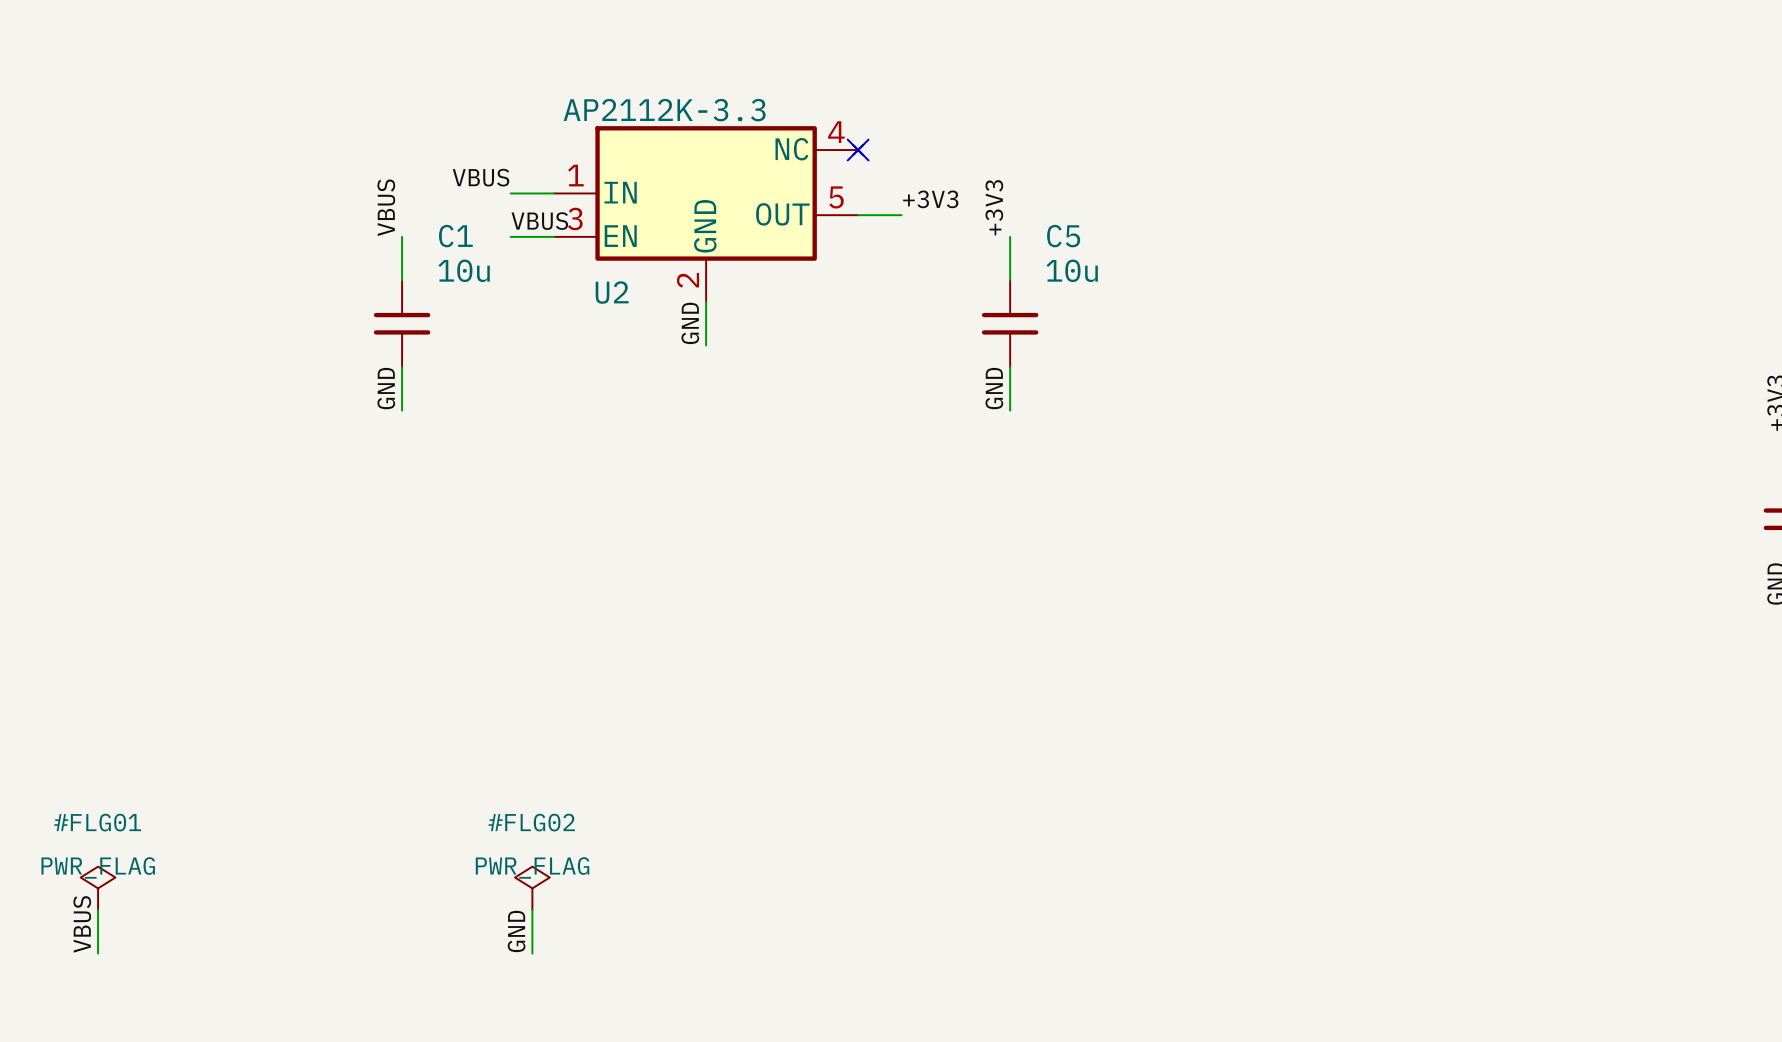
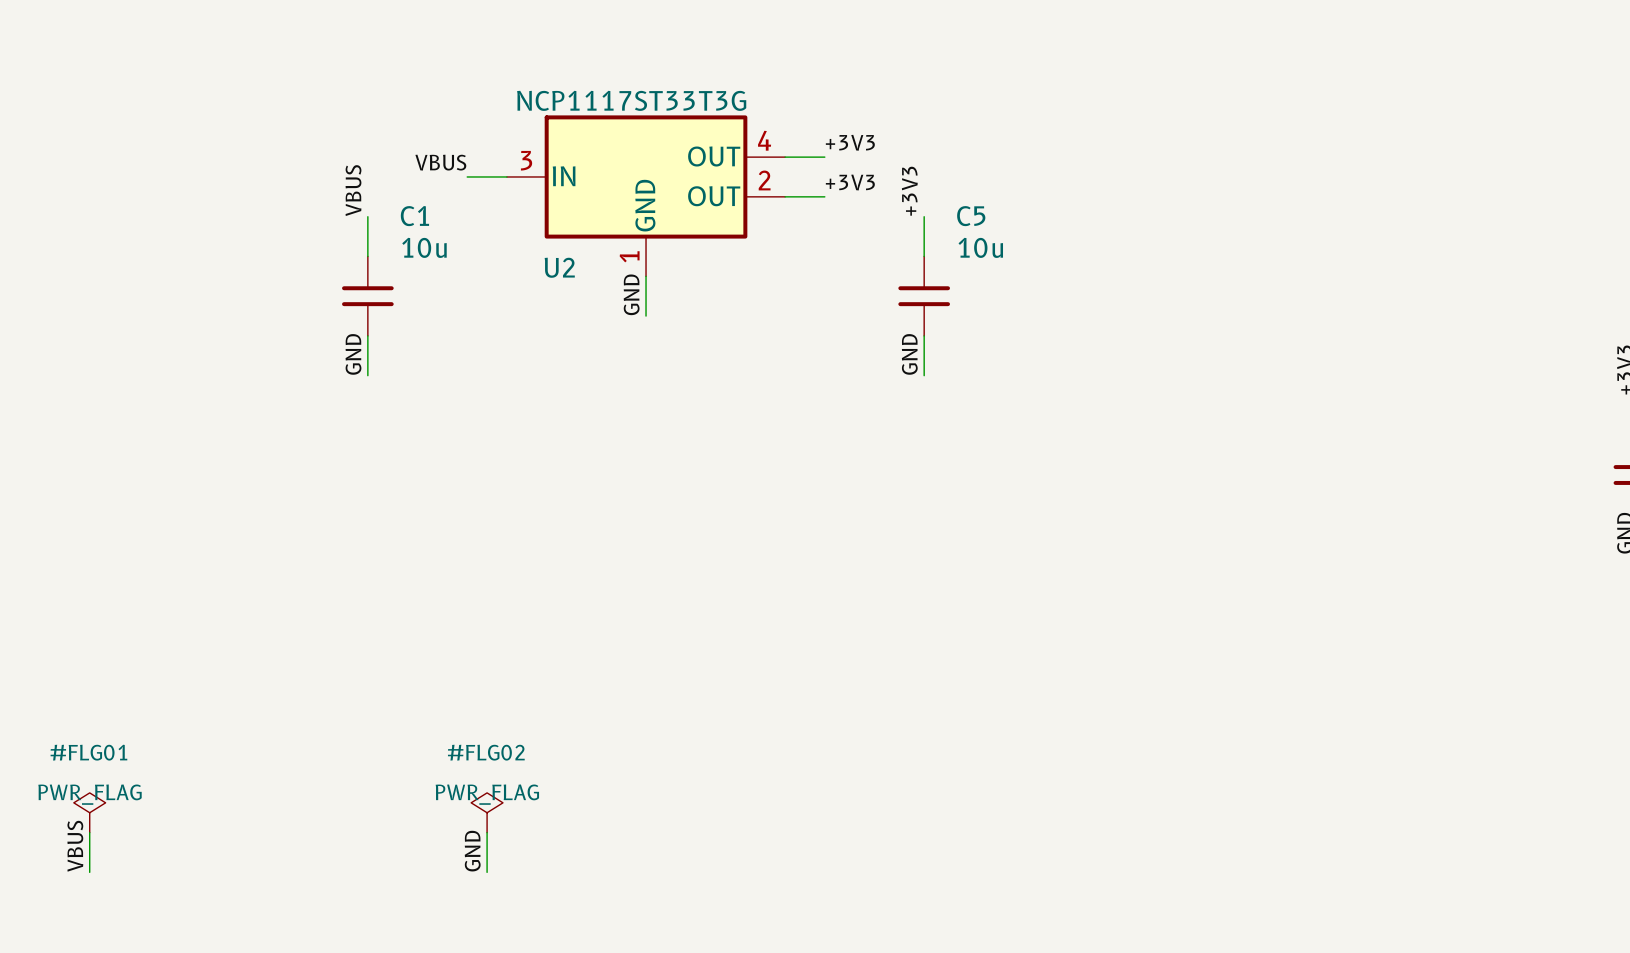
U2 value: AP2112K-3.3 (664, 110) -> NCP1117ST33T3G (631, 100)
U2 symbol: [554, 126, 864, 303] -> [506, 115, 786, 277]
no-connect mark: (858, 150) -> none
label: none -> +3V3 (850, 142)
label: VBUS (539, 221) -> none
wire: (510, 236) (554, 236) -> (785, 157) (824, 157)

